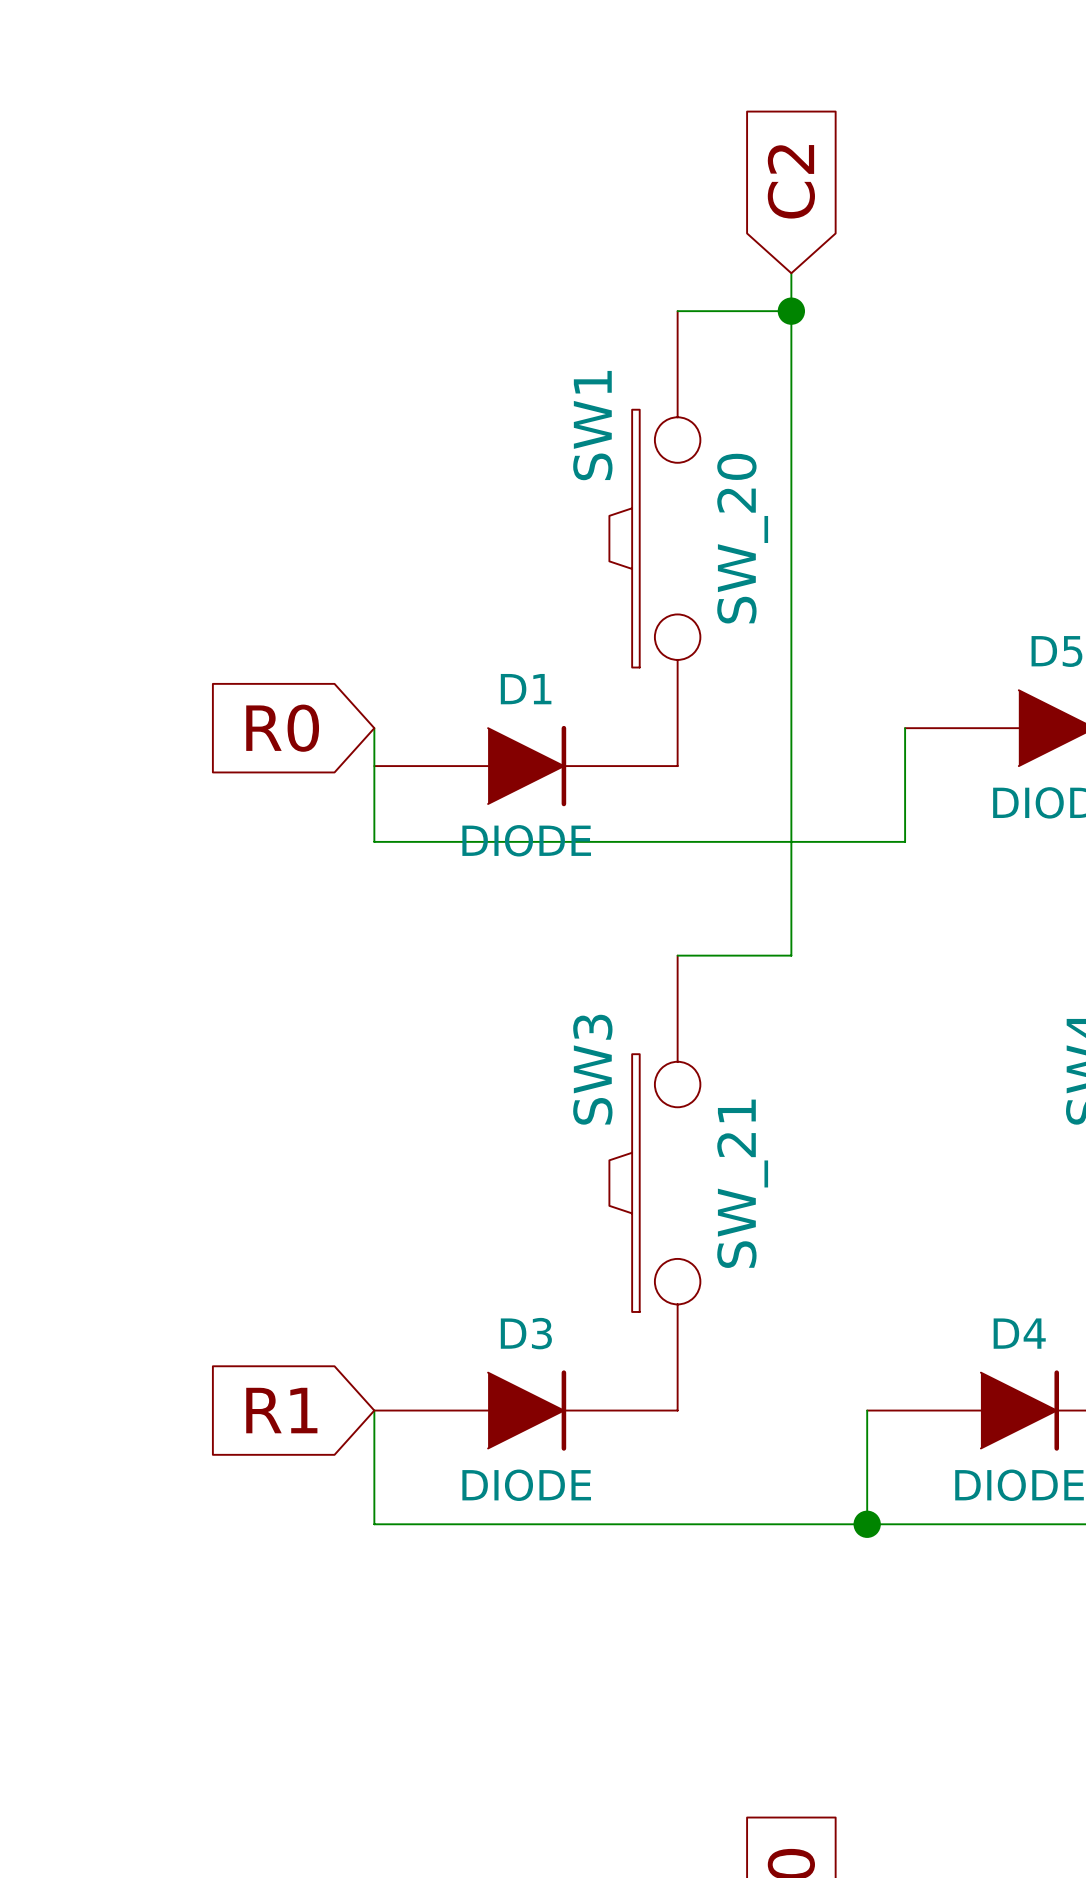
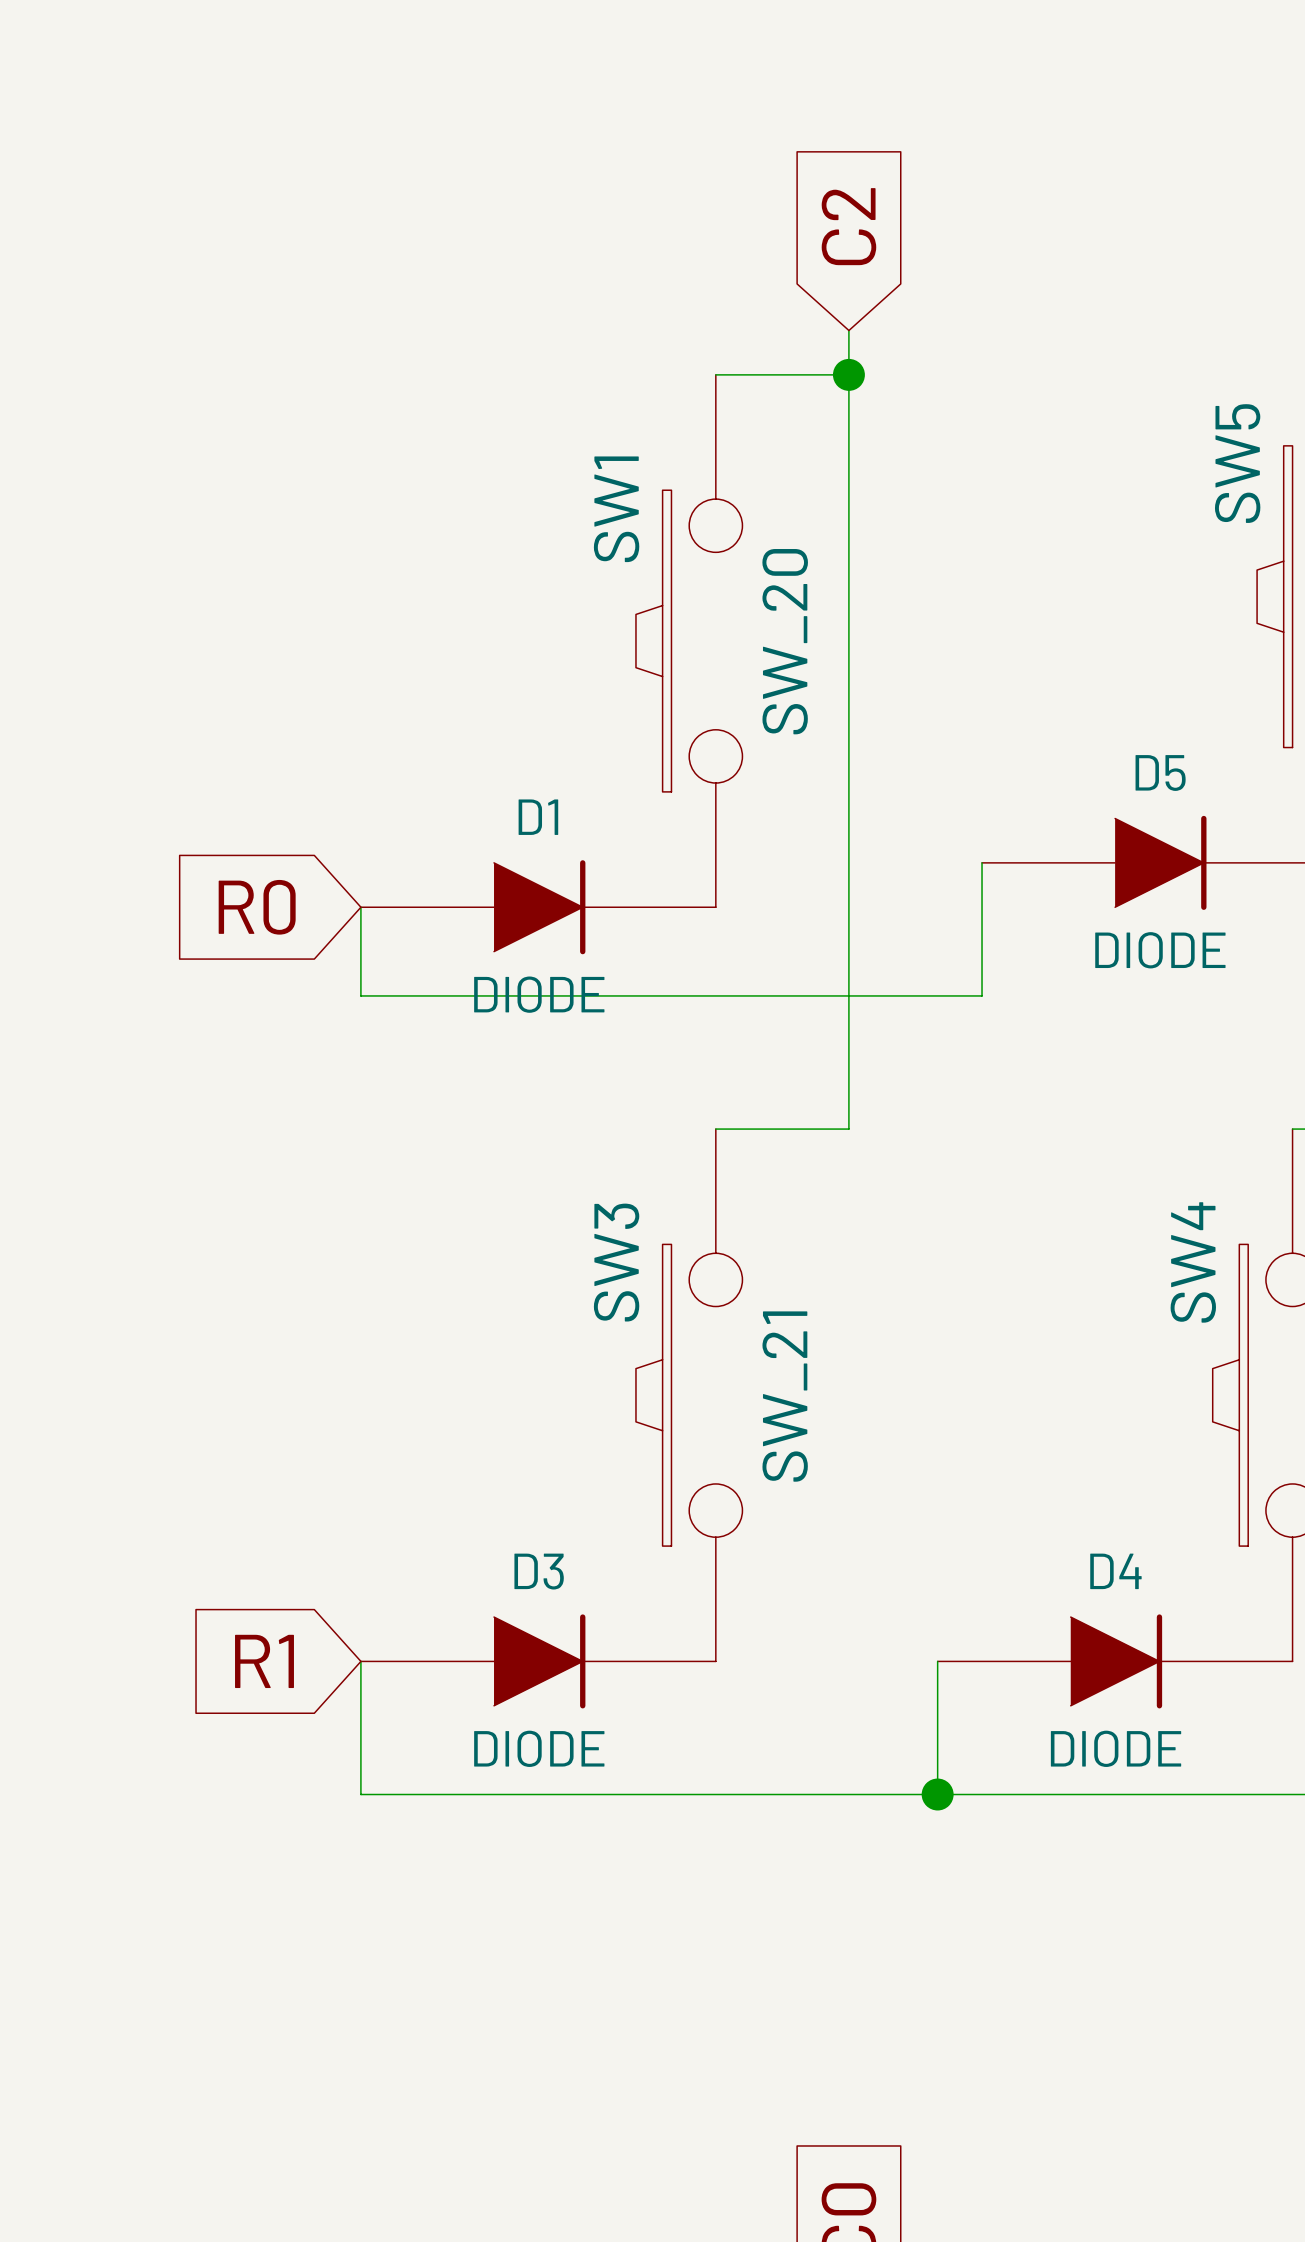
global label position: R0 (282, 728) -> R0 (257, 907)
wire: (374, 728) (374, 766) -> none

